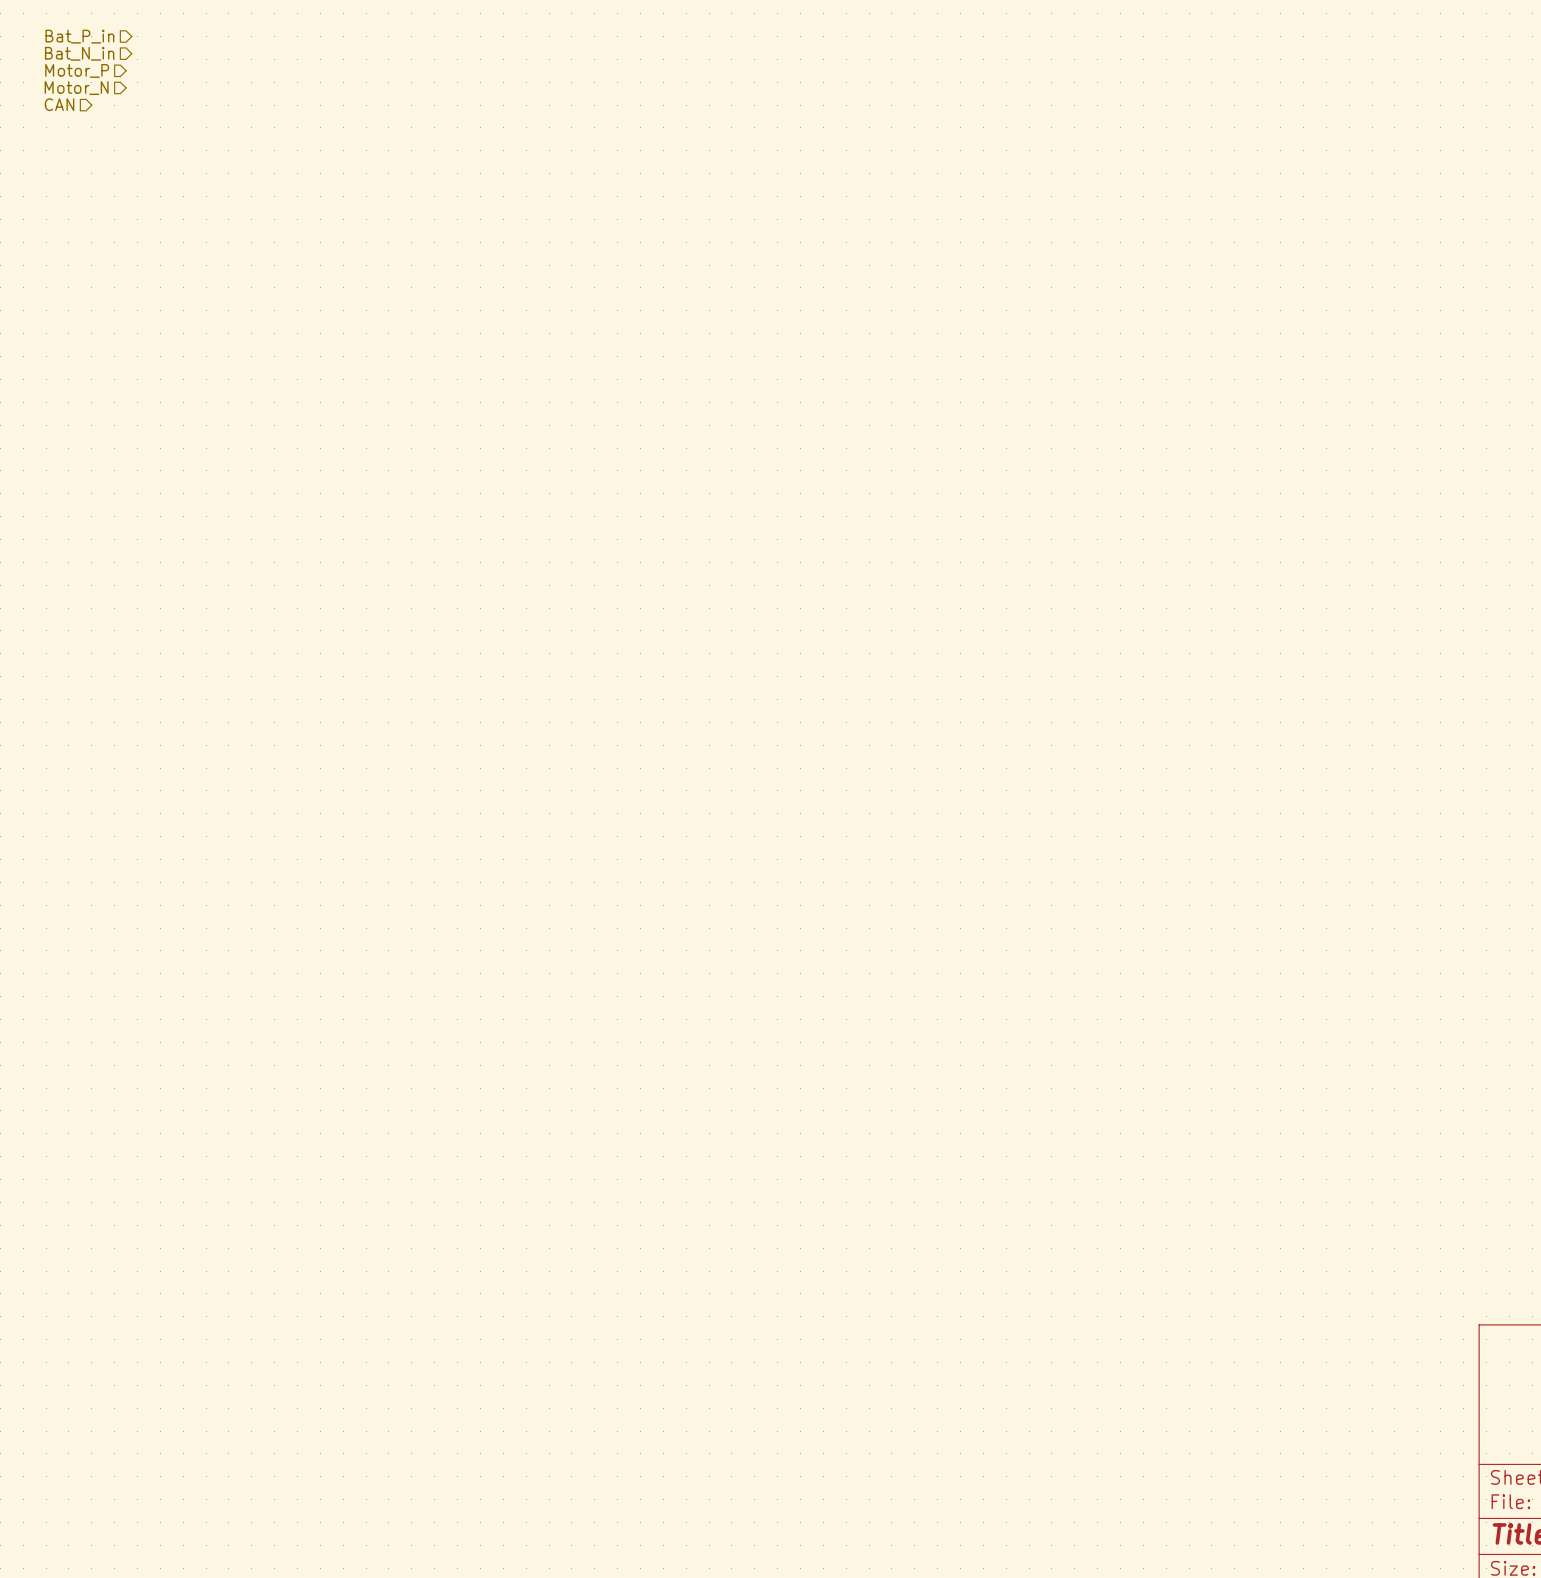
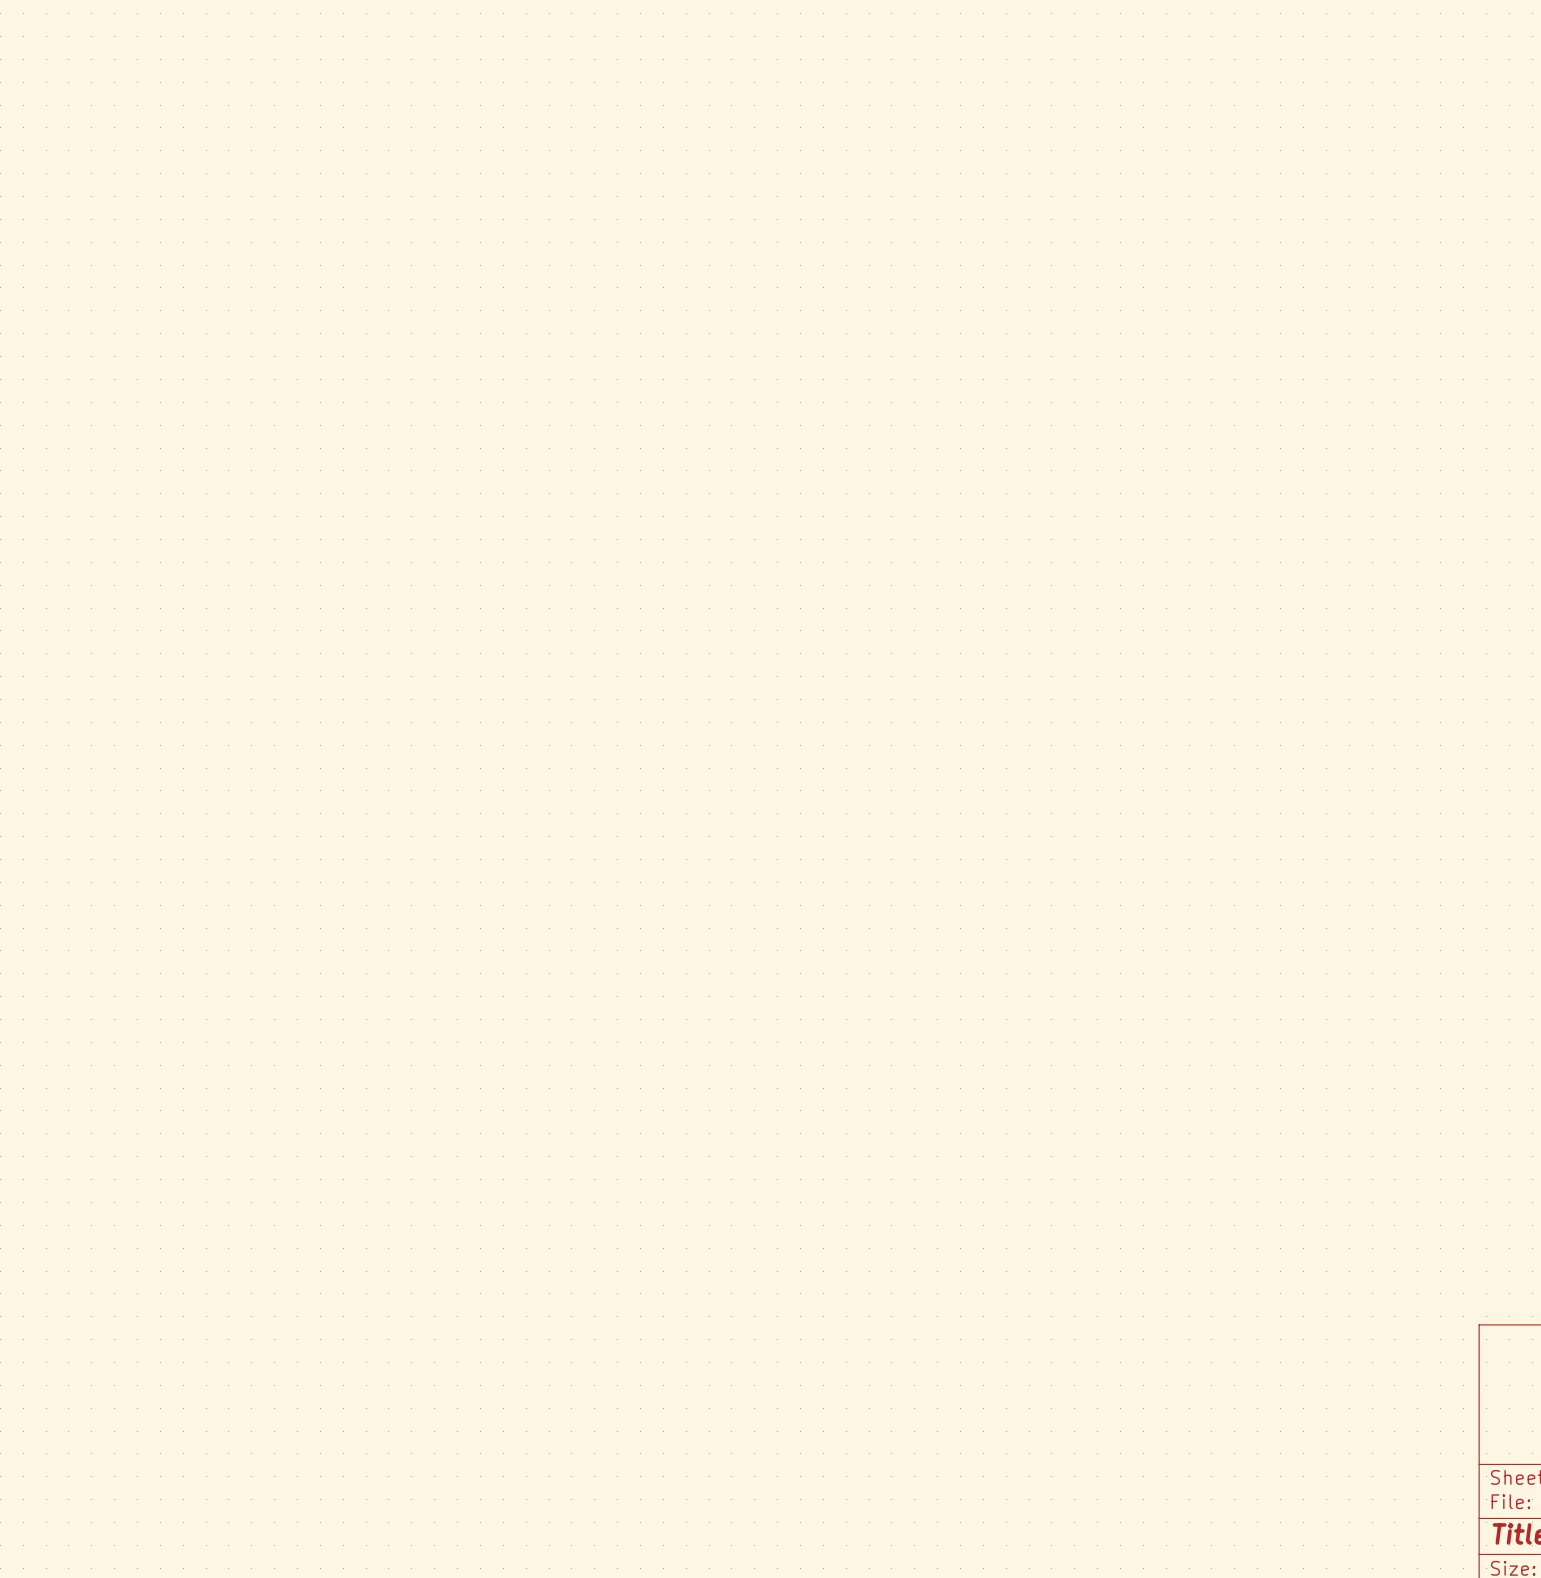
hierarchical label: Bat_P_in (79, 36) -> none
hierarchical label: Bat_N_in (79, 53) -> none
hierarchical label: Motor_P (77, 70) -> none
hierarchical label: Motor_N (76, 88) -> none
hierarchical label: CAN (59, 104) -> none

